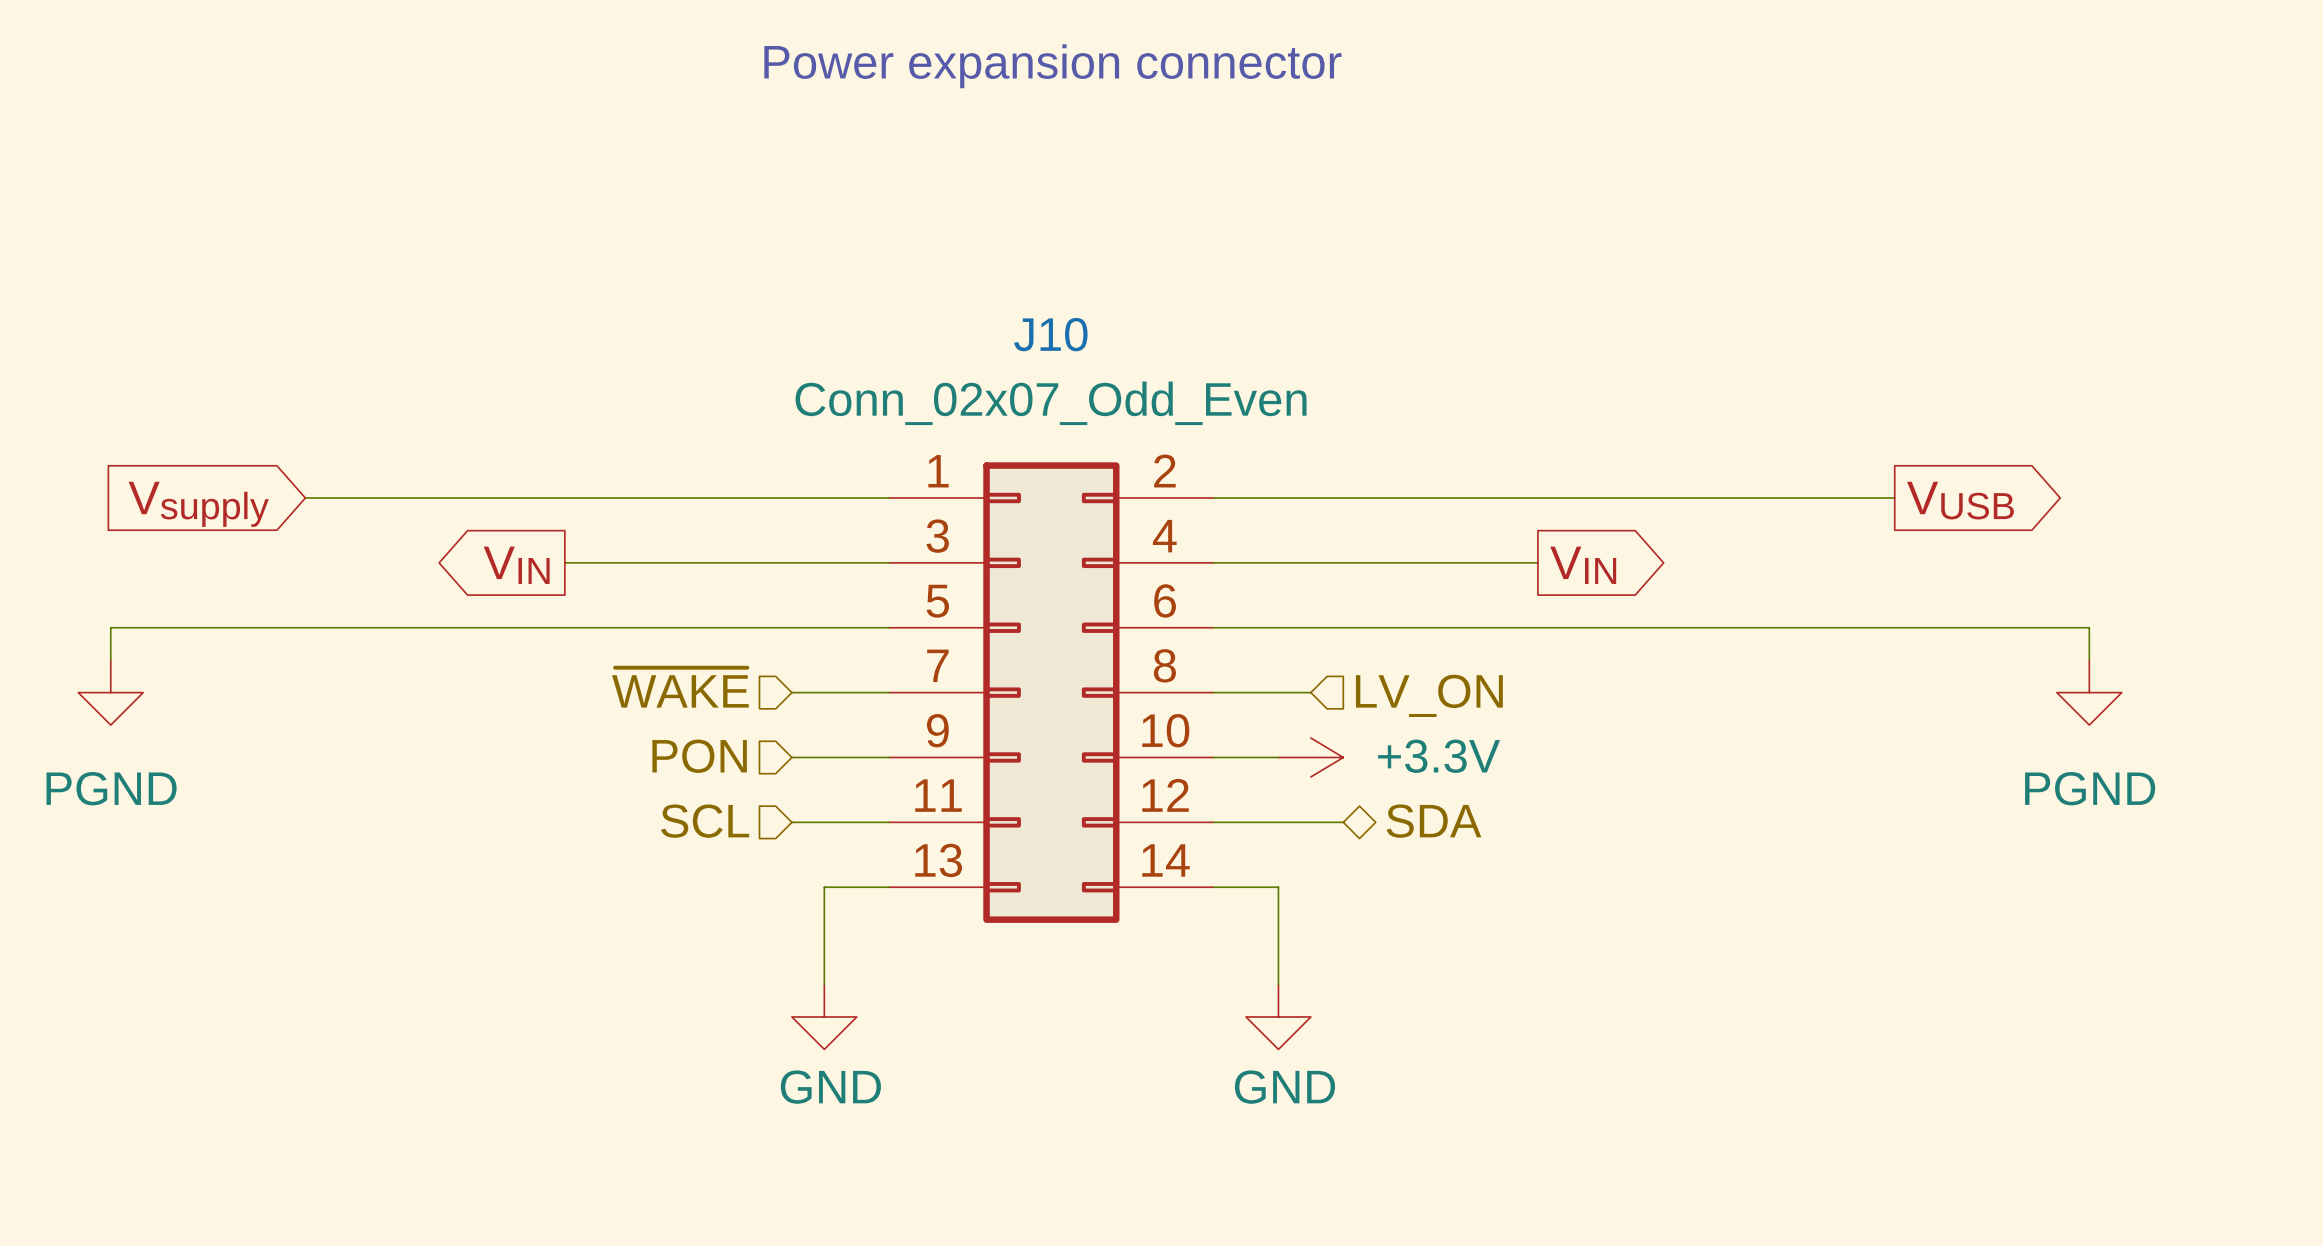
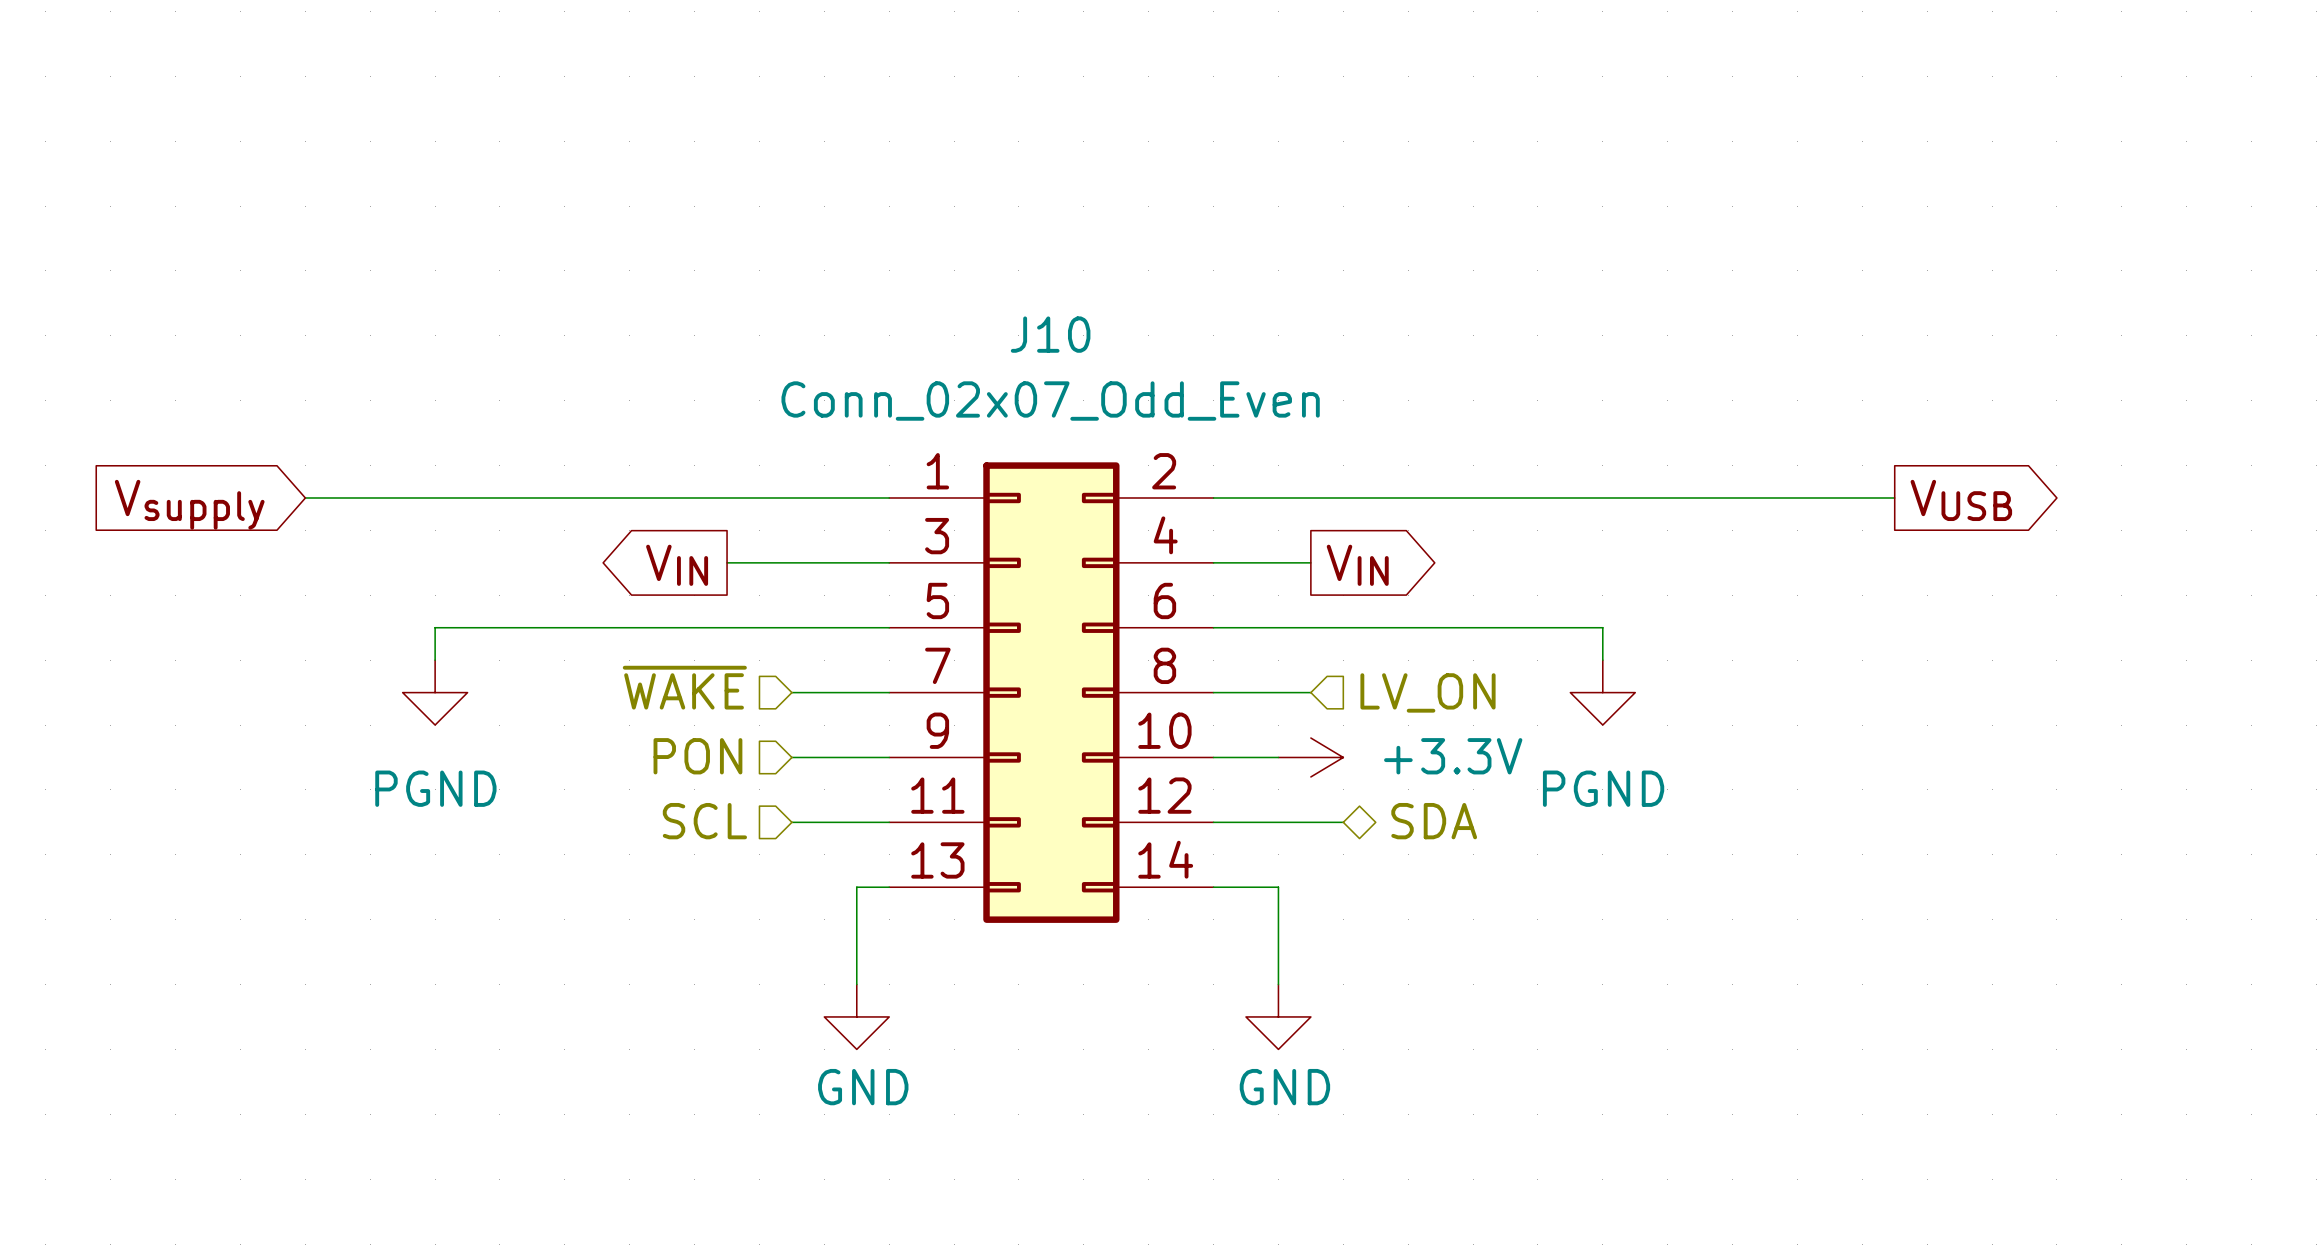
text: Power expansion connector (1052, 66) -> none
wire: (564, 562) (727, 562) -> none
wire: (1310, 562) (1537, 562) -> none
global label position: VIN (516, 565) -> VIN (677, 565)
global label position: VIN (1583, 565) -> VIN (1357, 565)
wire: (435, 627) (110, 627) (110, 660) -> (435, 627) (435, 660)
wire: (1602, 627) (2089, 627) (2089, 660) -> (1602, 627) (1602, 660)
power symbol position: PGND (110, 692) -> PGND (435, 692)
power symbol position: PGND (2089, 692) -> PGND (1602, 692)
wire: (856, 887) (824, 887) (824, 984) -> (856, 887) (856, 984)
power symbol position: GND (824, 1016) -> GND (856, 1016)

